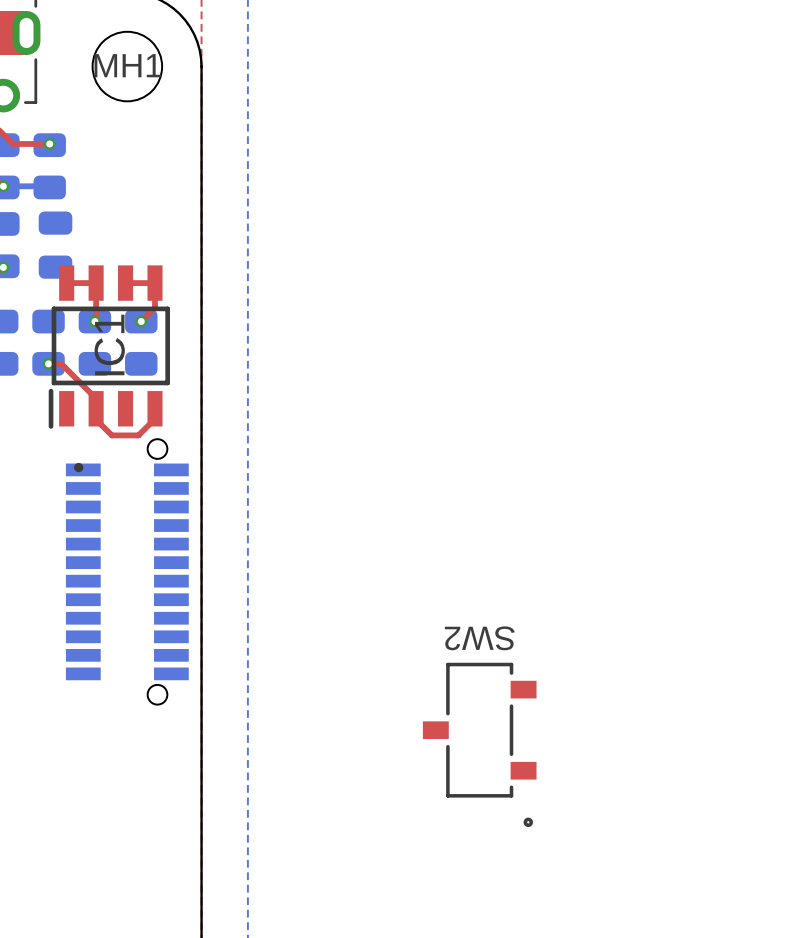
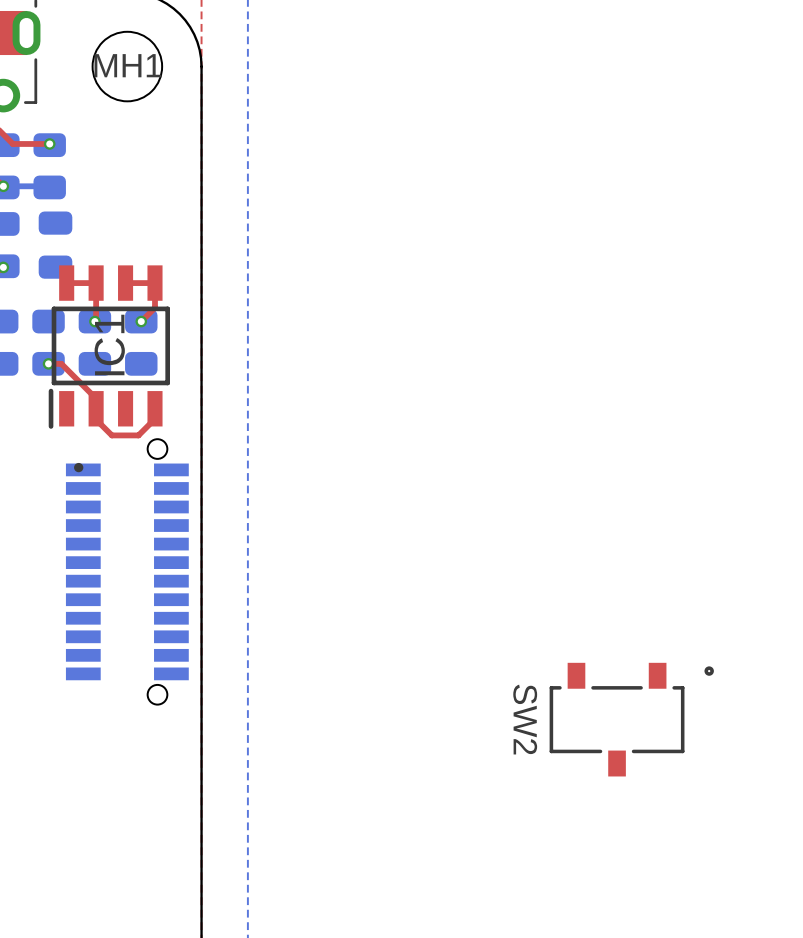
SW2 rotation: 0° (479, 744) -> 90° counterclockwise (631, 719)
SW2 position: (479, 744) -> (631, 719)

